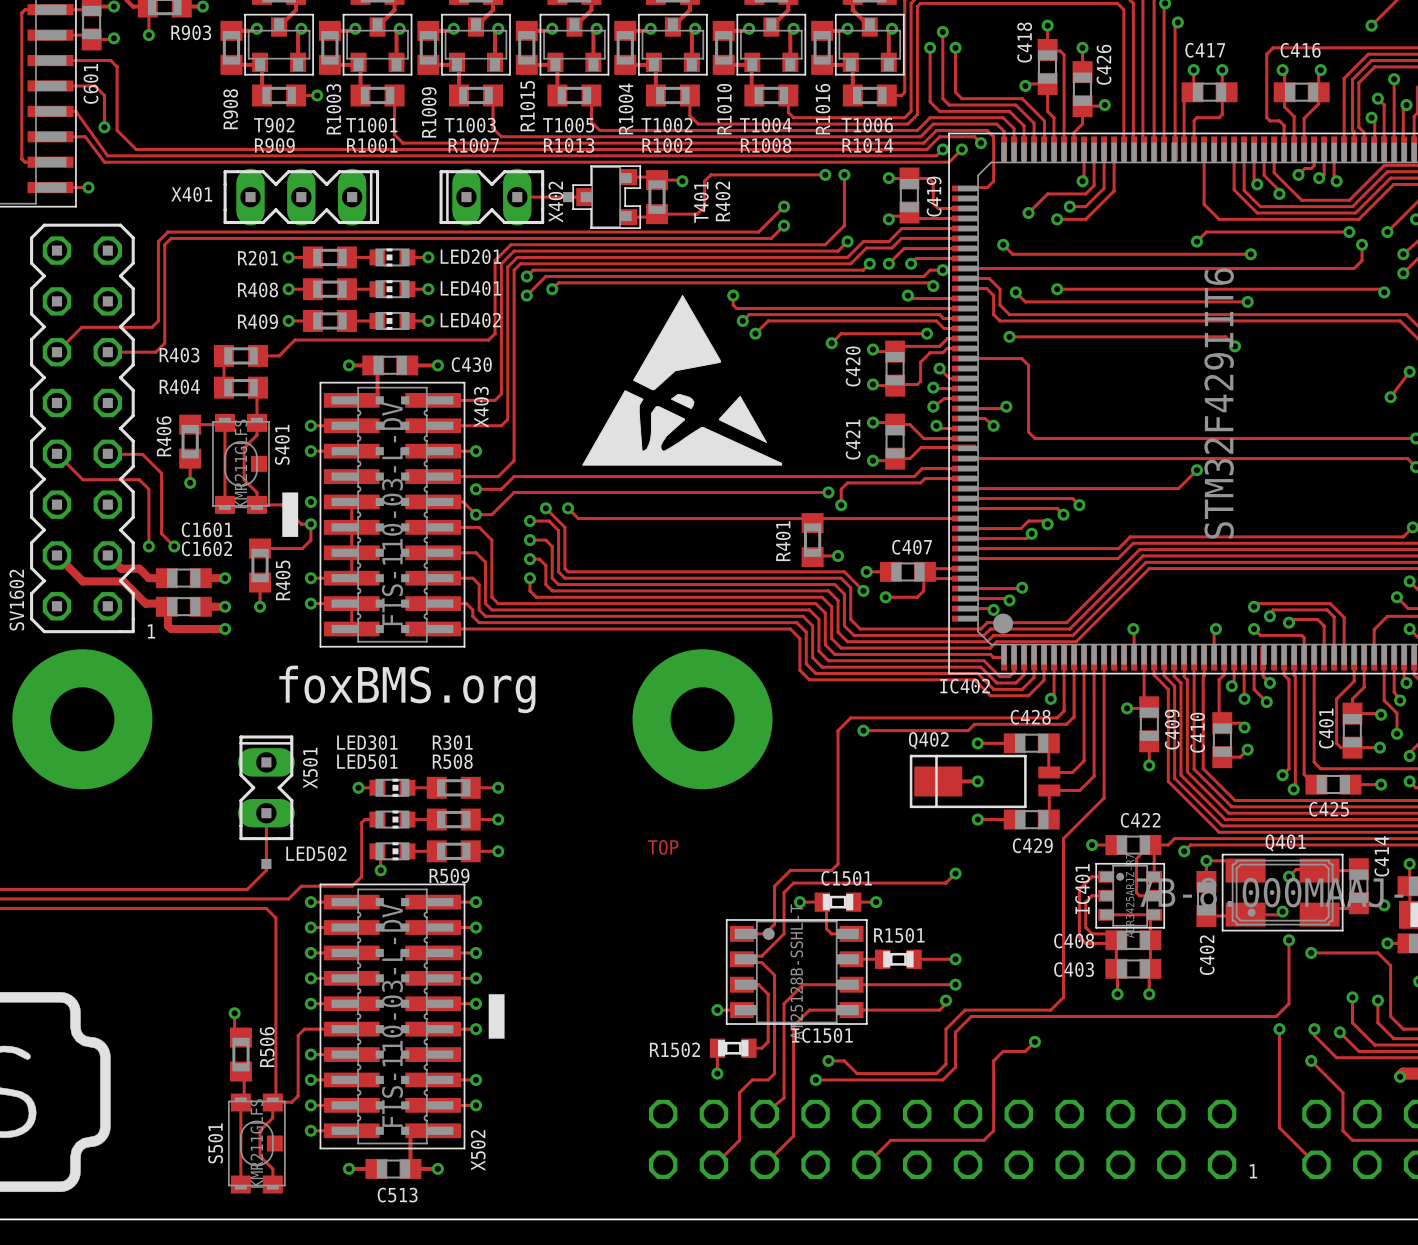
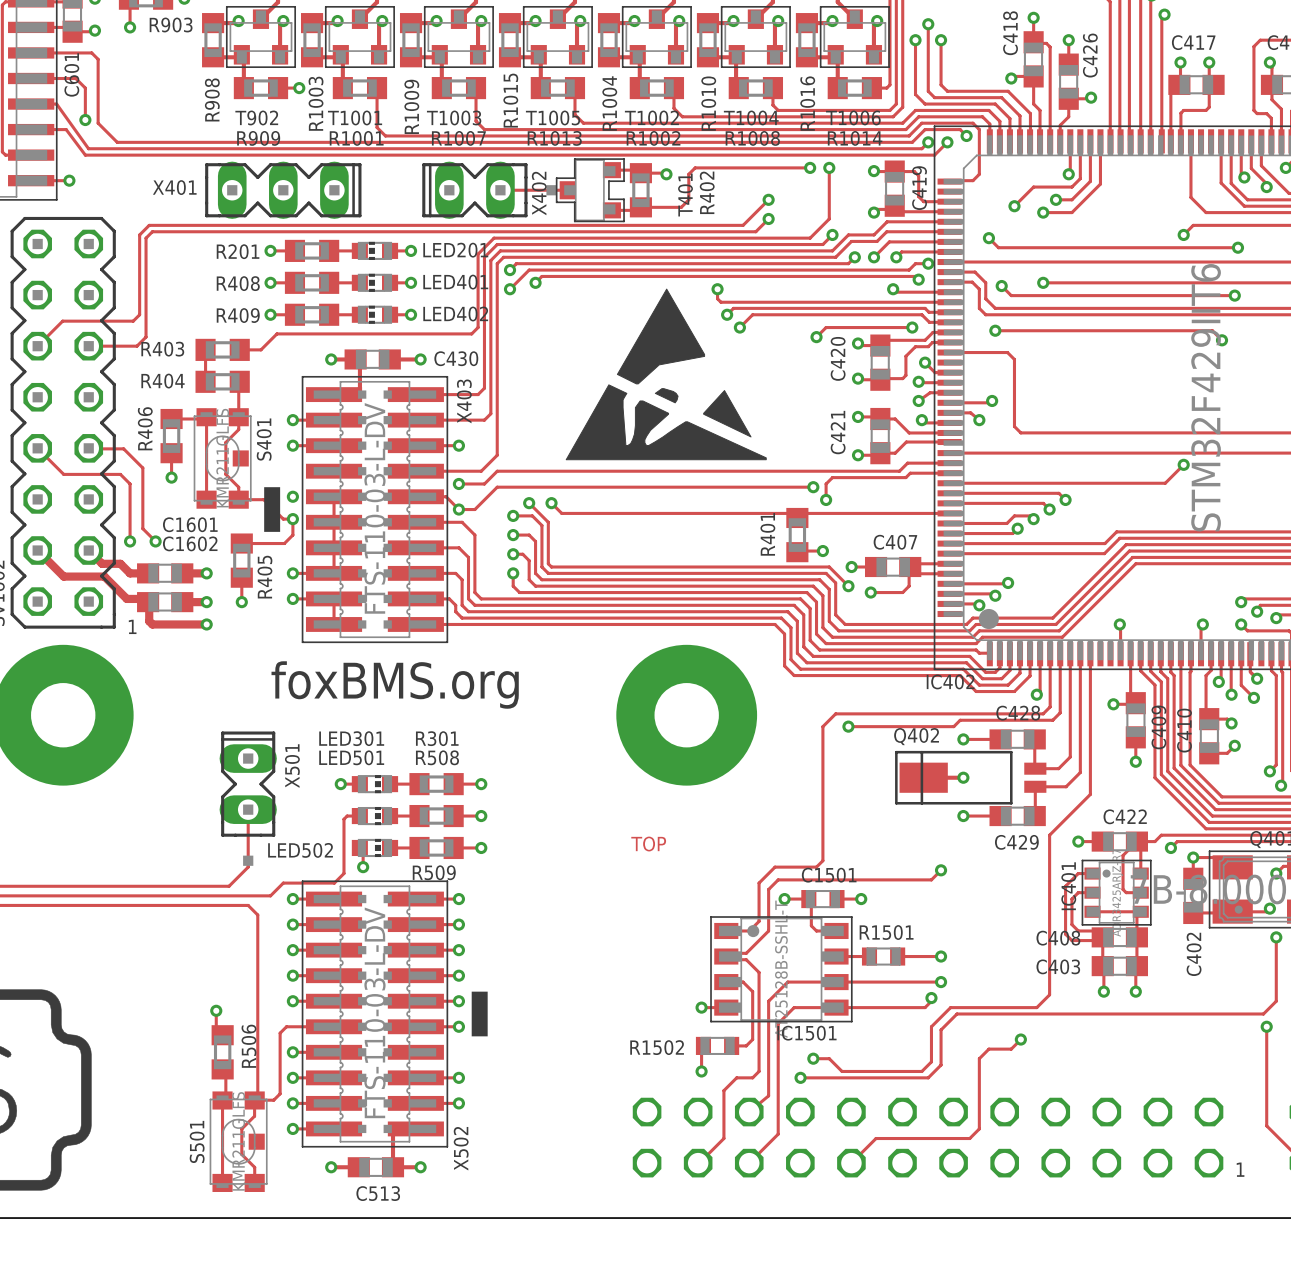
C1501 footprint: [814, 892, 862, 912] -> [801, 890, 845, 909]
R1501 footprint: [874, 949, 922, 969] -> [861, 947, 906, 966]
R1502 footprint: [709, 1038, 757, 1058] -> [695, 1036, 740, 1055]

